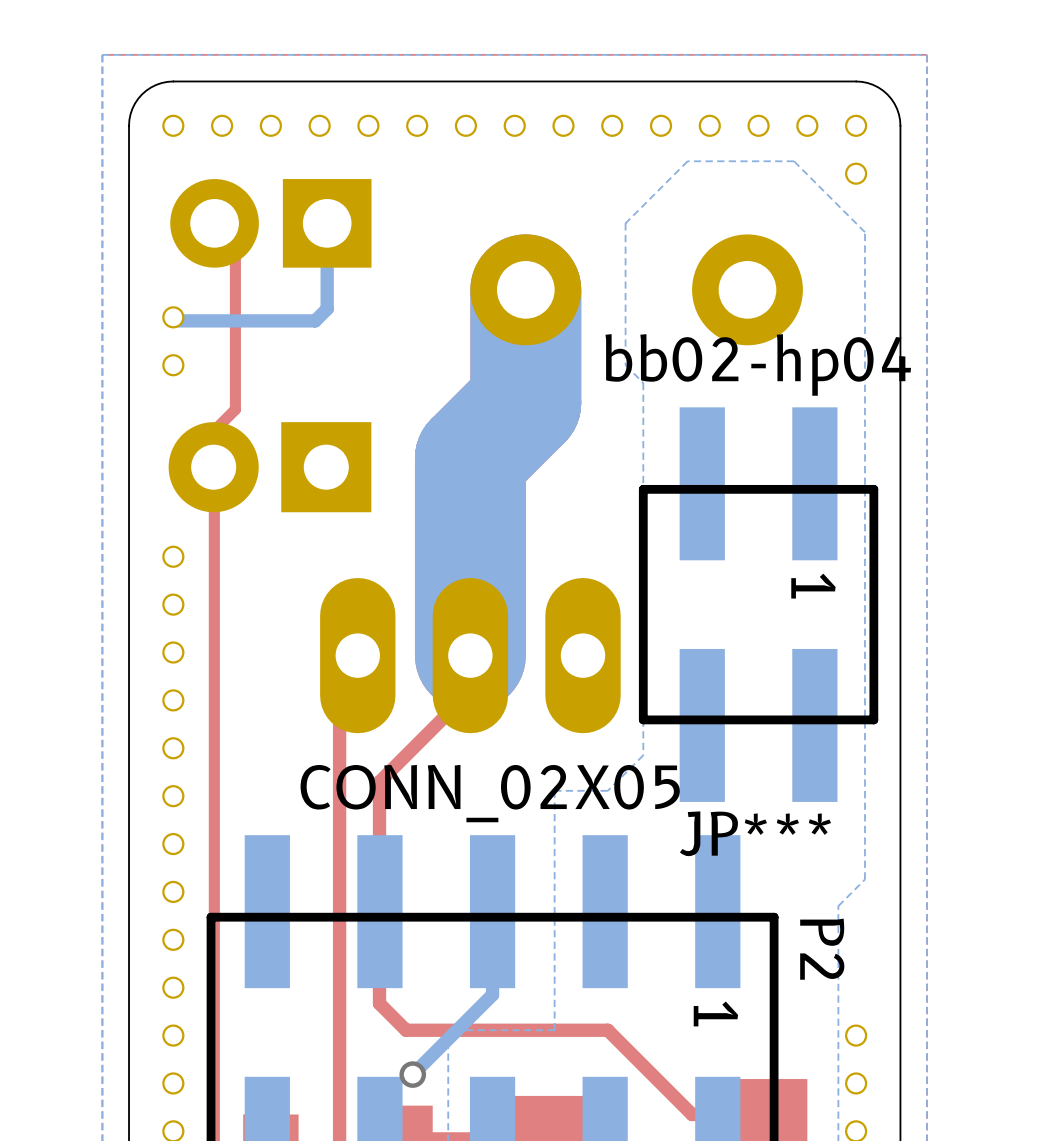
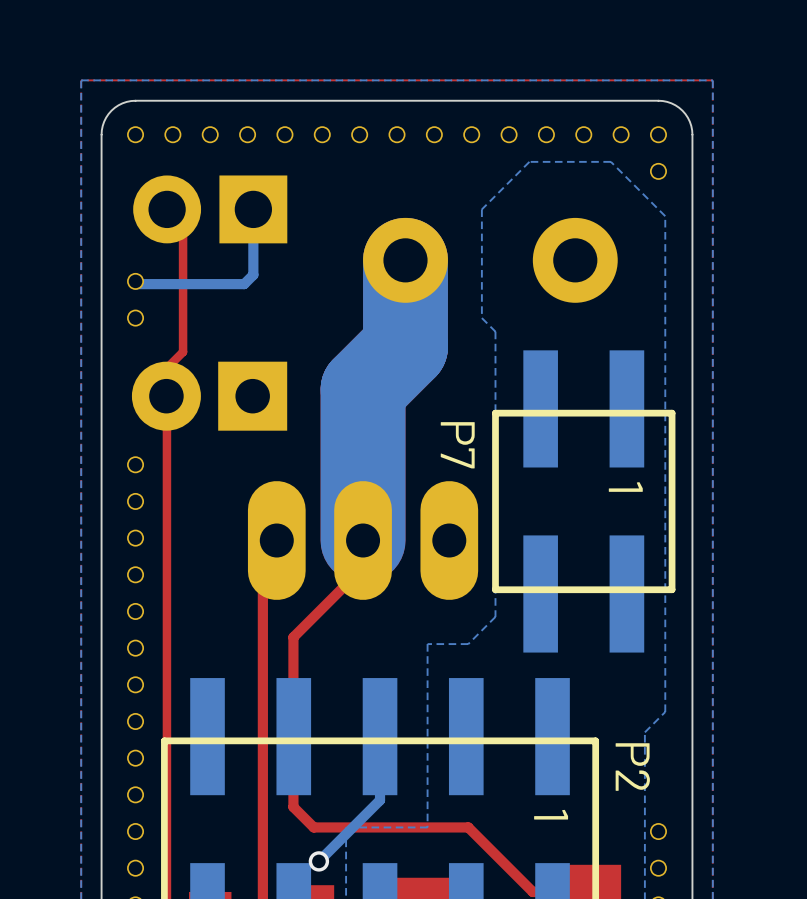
JP*** value: bb02-hp04 (758, 364) -> none
P2 value: CONN_02X05 (490, 793) -> none
JP*** name: JP*** (755, 833) -> P7 (457, 445)

